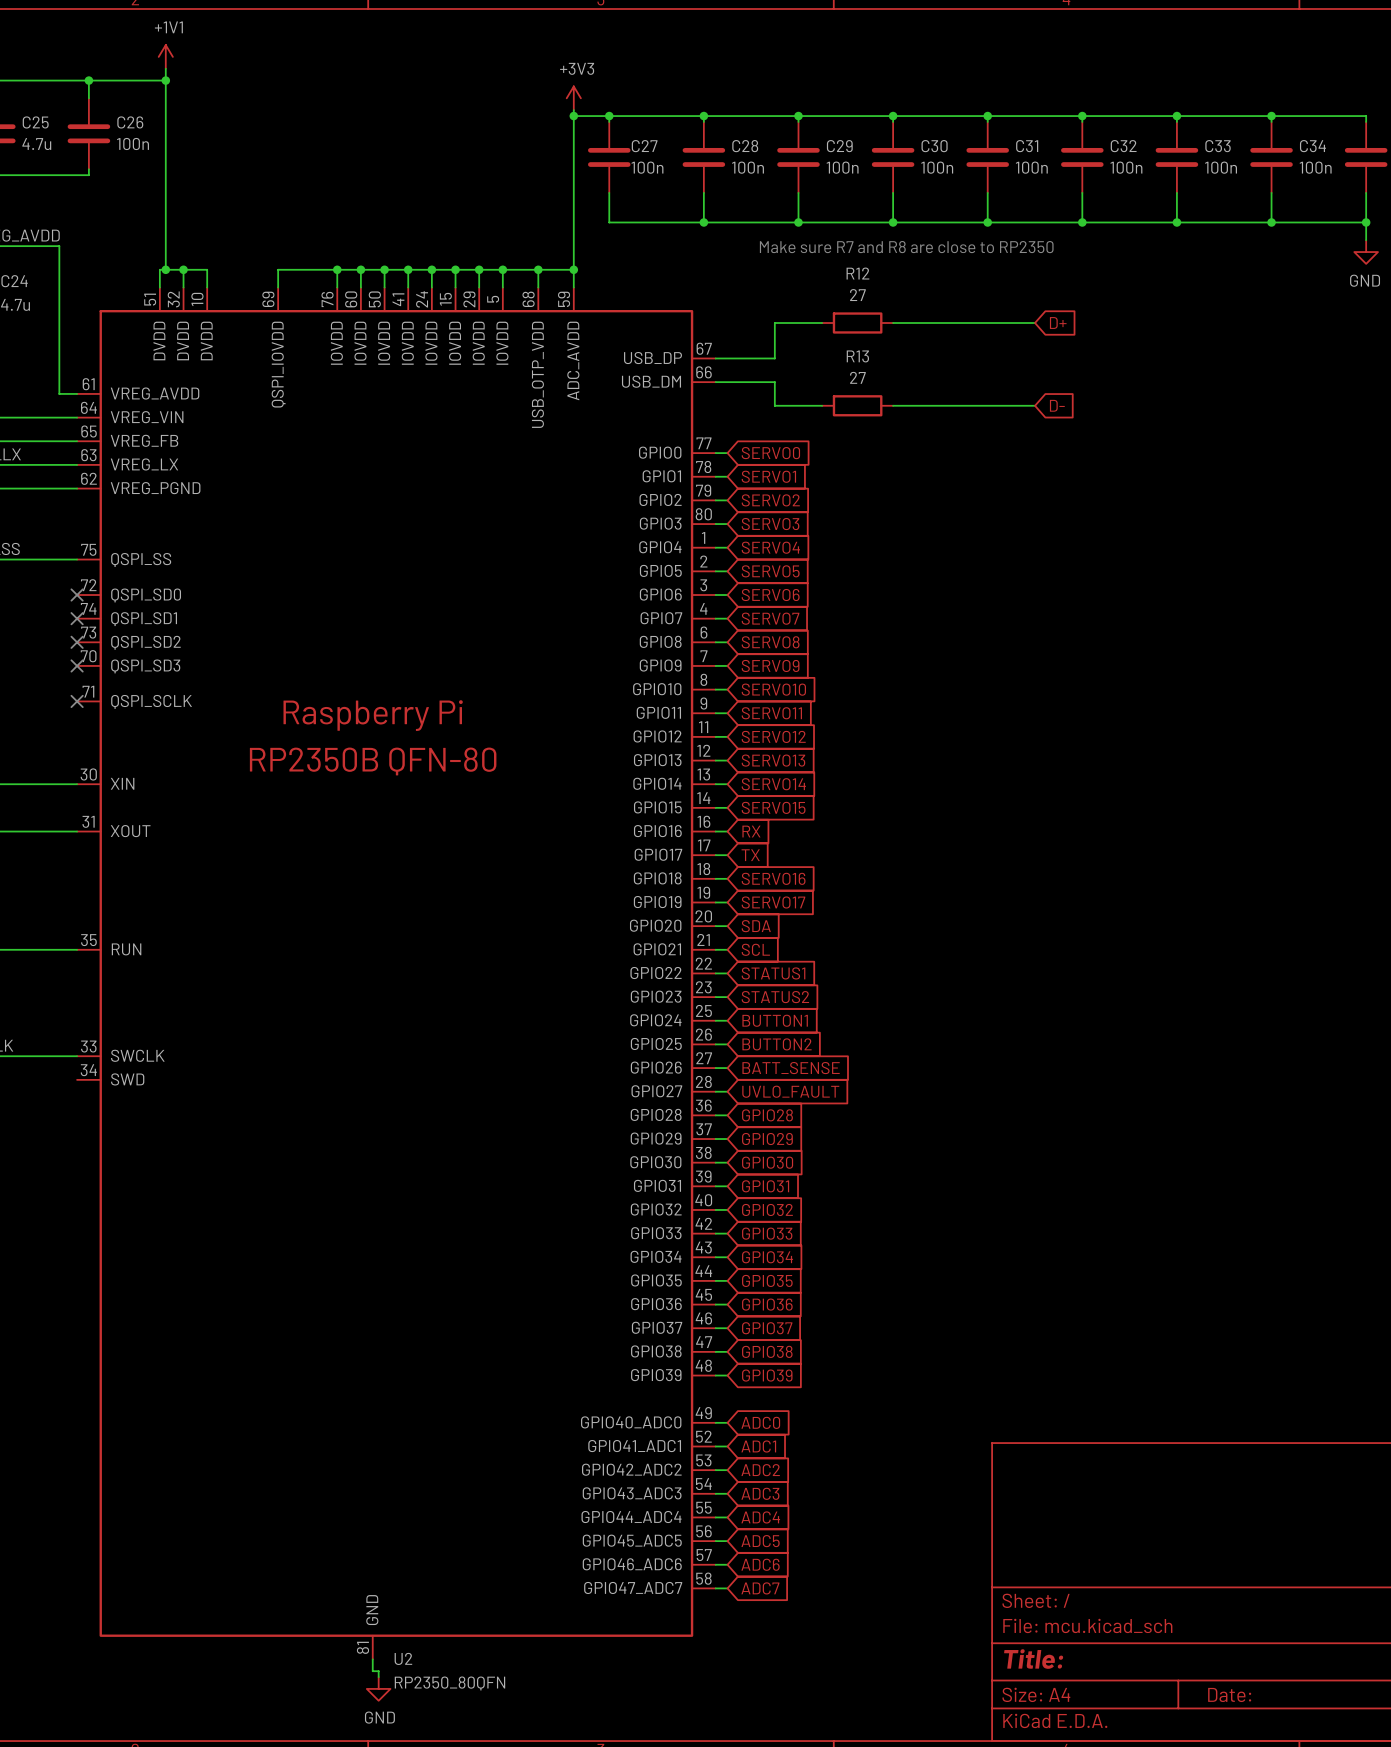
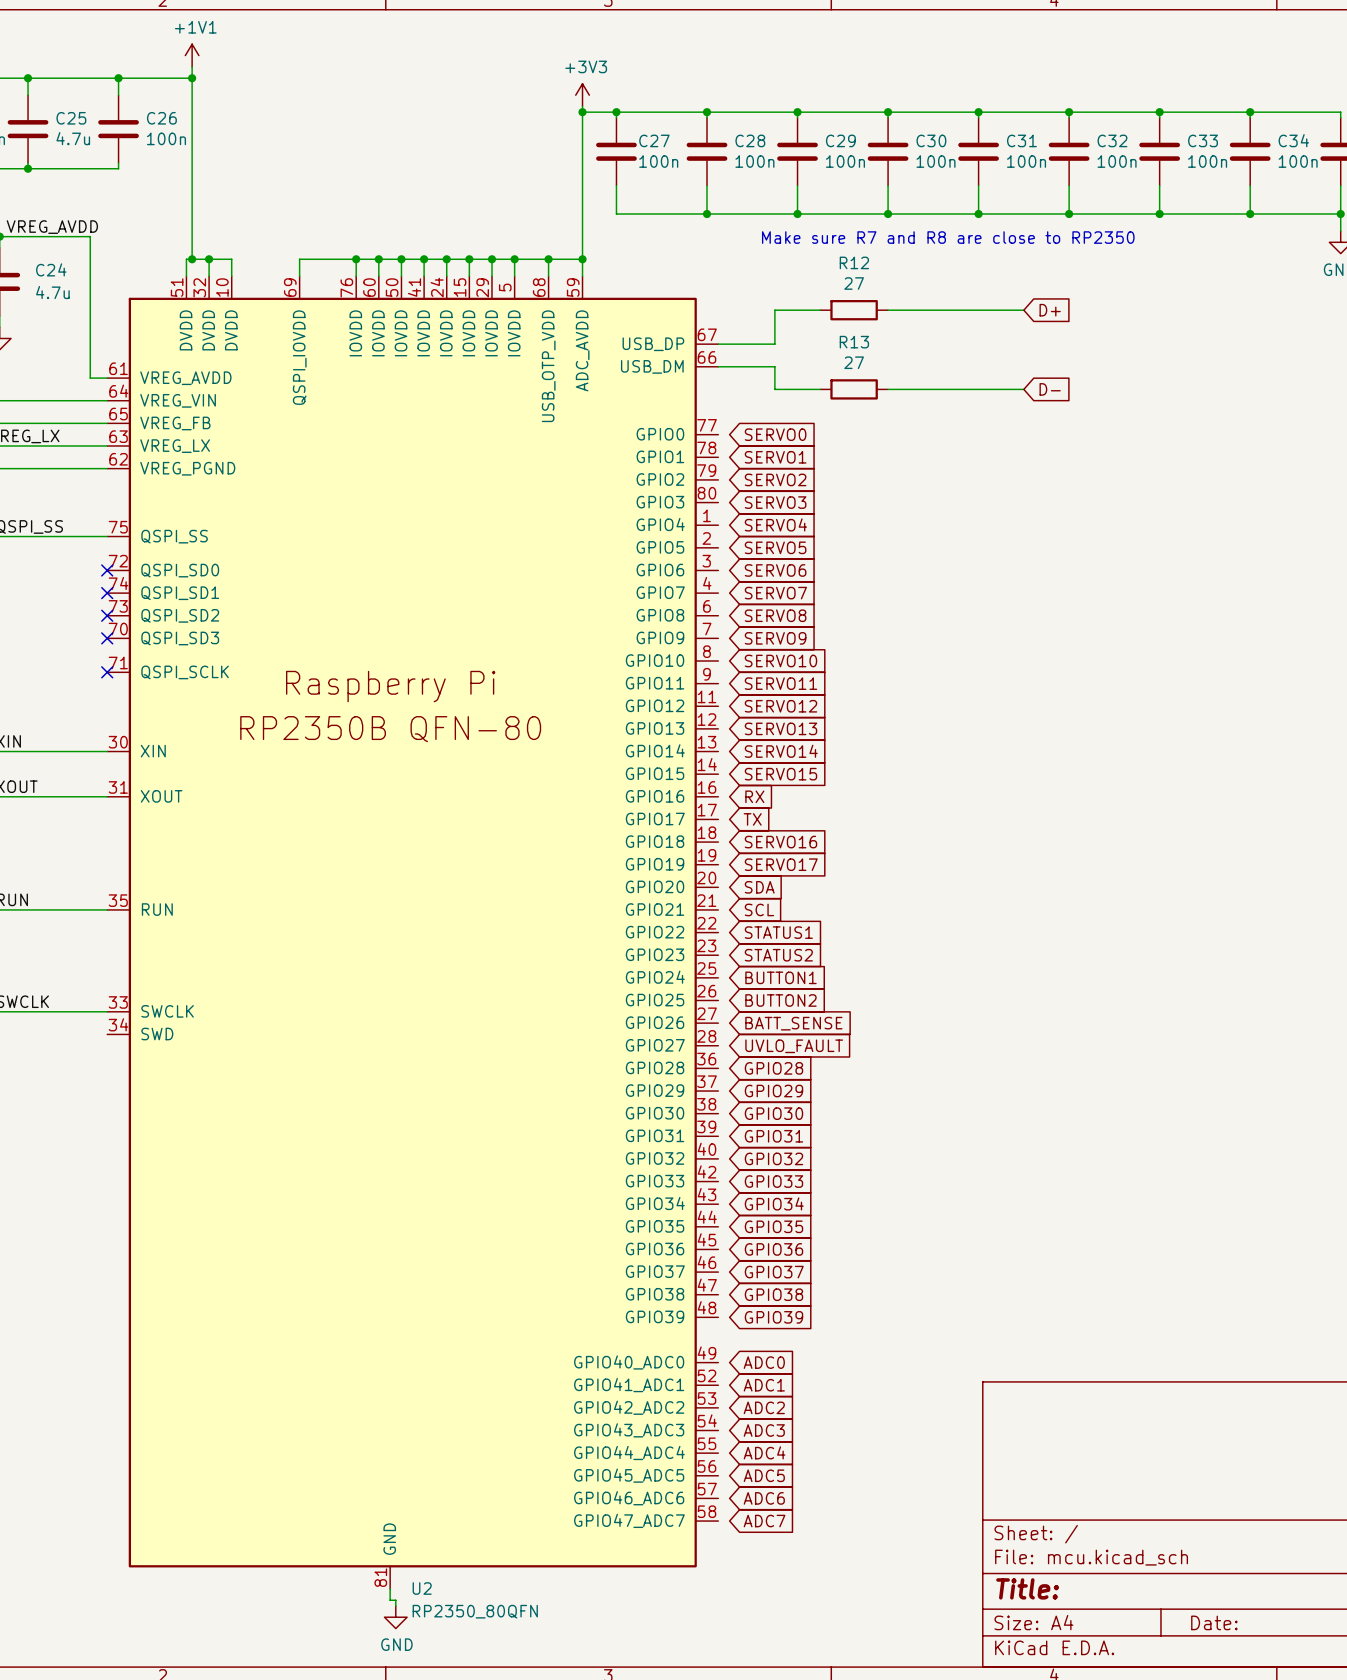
wire: (715, 453) (727, 453) -> none
wire: (715, 476) (727, 476) -> none
wire: (715, 500) (727, 500) -> none
wire: (715, 524) (727, 524) -> none
wire: (715, 547) (727, 547) -> none
wire: (715, 571) (727, 571) -> none
wire: (715, 595) (727, 595) -> none
wire: (715, 618) (727, 618) -> none
wire: (715, 642) (727, 642) -> none
wire: (715, 665) (727, 665) -> none
wire: (715, 689) (727, 689) -> none
wire: (715, 713) (727, 713) -> none
wire: (715, 736) (727, 736) -> none
wire: (715, 760) (727, 760) -> none
wire: (715, 784) (727, 784) -> none
wire: (715, 807) (727, 807) -> none
wire: (715, 831) (727, 831) -> none
wire: (715, 855) (727, 855) -> none
wire: (715, 878) (727, 878) -> none
wire: (715, 902) (727, 902) -> none
wire: (715, 926) (727, 926) -> none
wire: (715, 949) (727, 949) -> none
wire: (715, 973) (727, 973) -> none
wire: (715, 997) (727, 997) -> none
wire: (715, 1020) (727, 1020) -> none
wire: (715, 1044) (727, 1044) -> none
wire: (715, 1068) (727, 1068) -> none
wire: (715, 1091) (727, 1091) -> none
wire: (715, 1115) (727, 1115) -> none
wire: (715, 1139) (727, 1139) -> none
wire: (715, 1162) (727, 1162) -> none
wire: (715, 1186) (727, 1186) -> none
wire: (715, 1209) (727, 1209) -> none
wire: (715, 1233) (727, 1233) -> none
wire: (715, 1257) (727, 1257) -> none
wire: (715, 1280) (727, 1280) -> none
wire: (715, 1304) (727, 1304) -> none
wire: (715, 1328) (727, 1328) -> none
wire: (715, 1351) (727, 1351) -> none
wire: (715, 1375) (727, 1375) -> none
wire: (715, 1422) (727, 1422) -> none
wire: (715, 1446) (727, 1446) -> none
wire: (715, 1470) (727, 1470) -> none
wire: (715, 1493) (727, 1493) -> none
wire: (715, 1517) (727, 1517) -> none
wire: (715, 1541) (727, 1541) -> none
wire: (715, 1564) (727, 1564) -> none
wire: (715, 1588) (727, 1588) -> none

